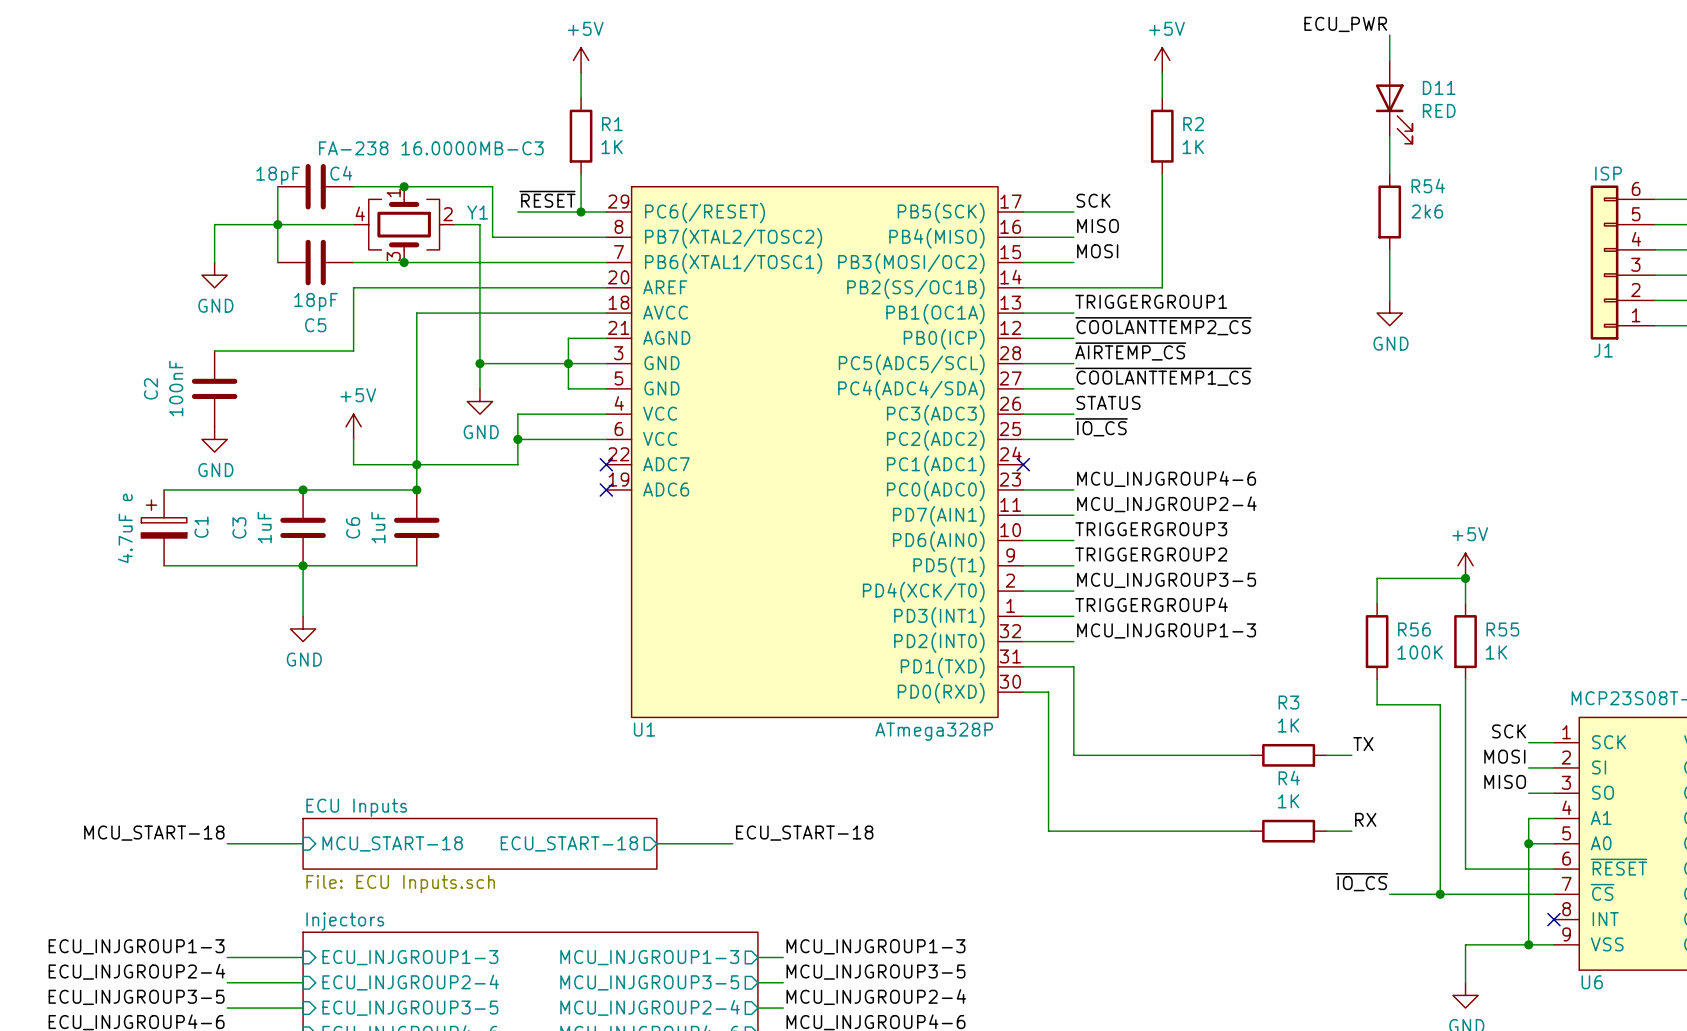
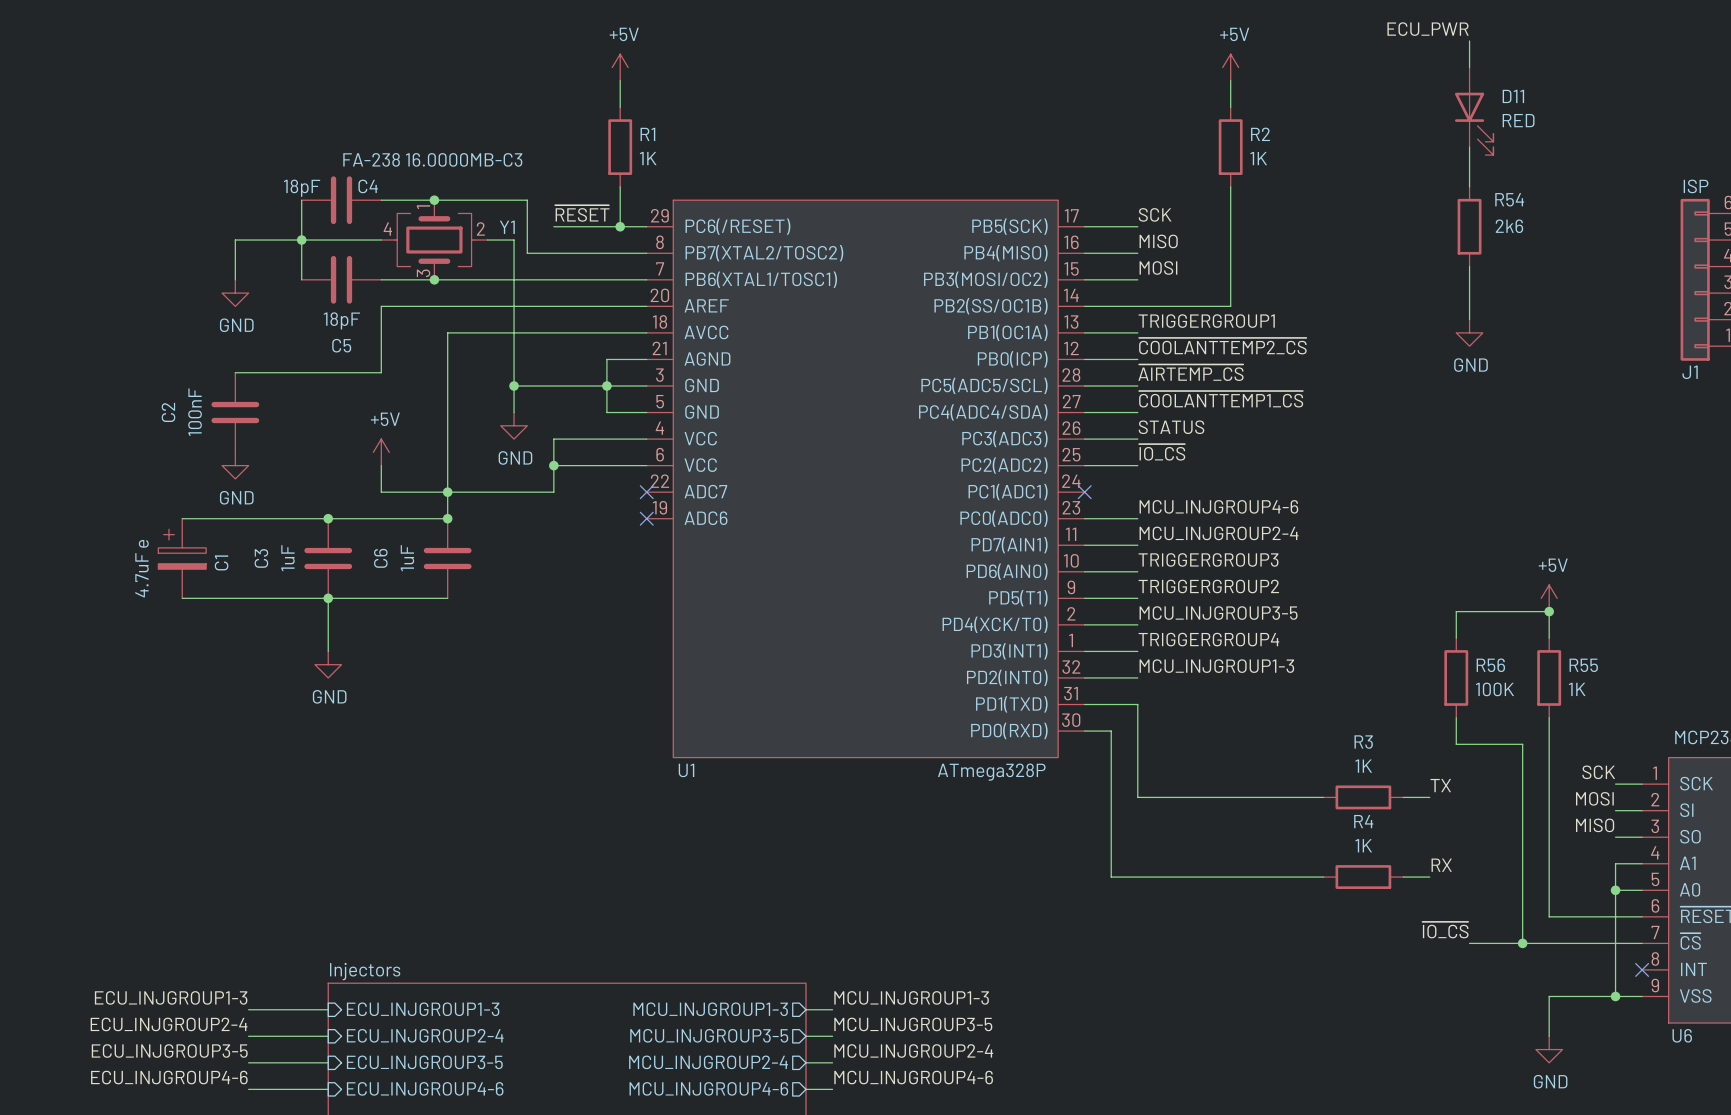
label: MCU_START-18 (154, 833) -> none
label: ECU_START-18 (804, 833) -> none
wire: (227, 843) (303, 843) -> none
sheet pin: MCU_START-18 (392, 843) -> none
sheet ECU Inputs: File: ECU Inputs.sch (479, 843) -> none
sheet pin: ECU_START-18 (569, 843) -> none
wire: (656, 843) (732, 843) -> none

